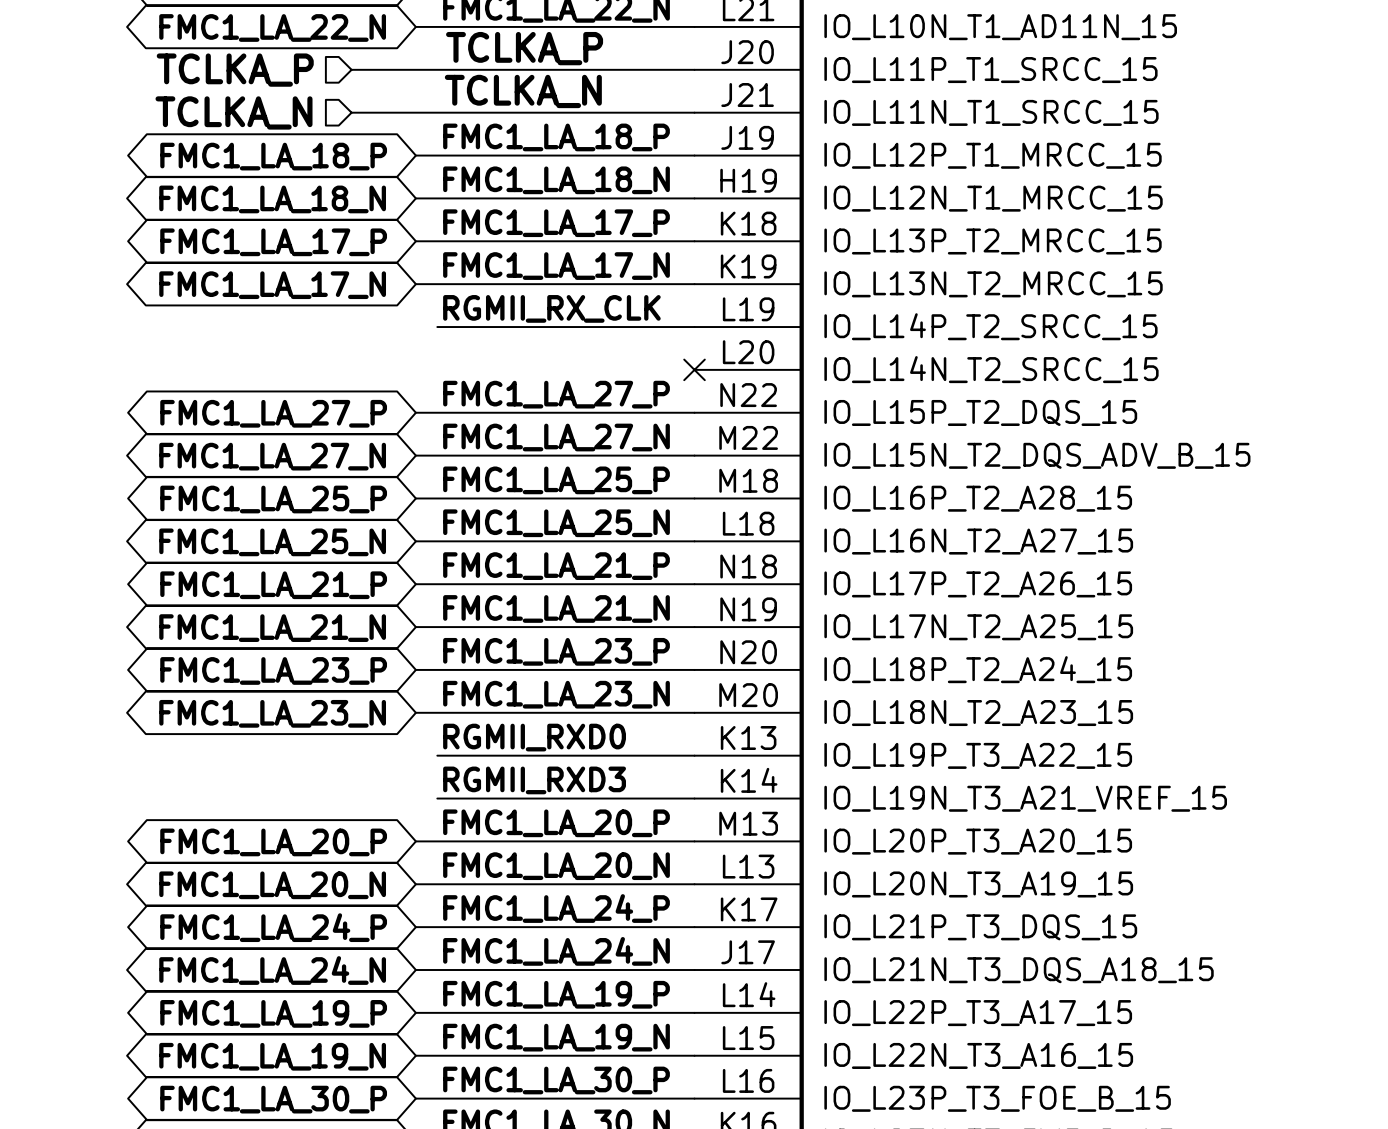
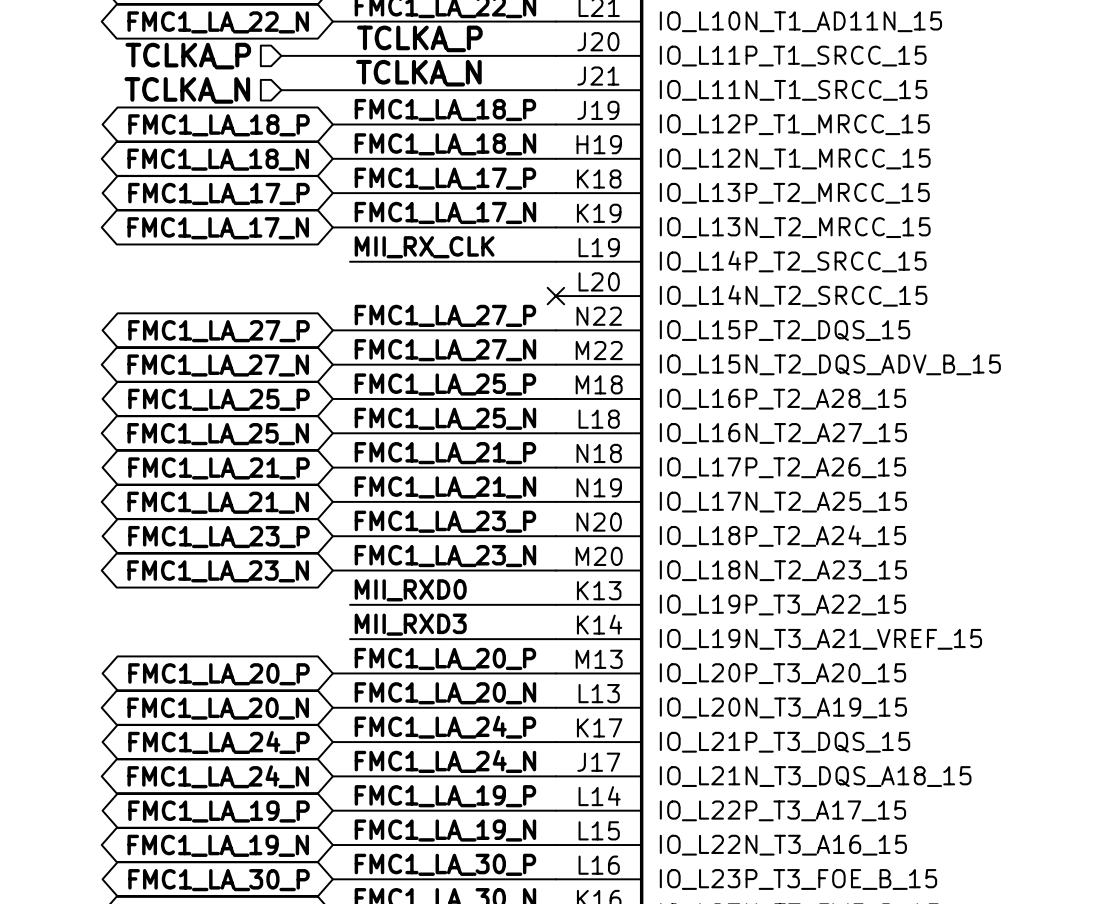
label: RGMII_RX_CLK (551, 308) -> MII_RX_CLK (424, 247)
label: RGMII_RXD0 (534, 737) -> MII_RXD0 (410, 590)
label: RGMII_RXD3 (534, 780) -> MII_RXD3 (410, 624)

